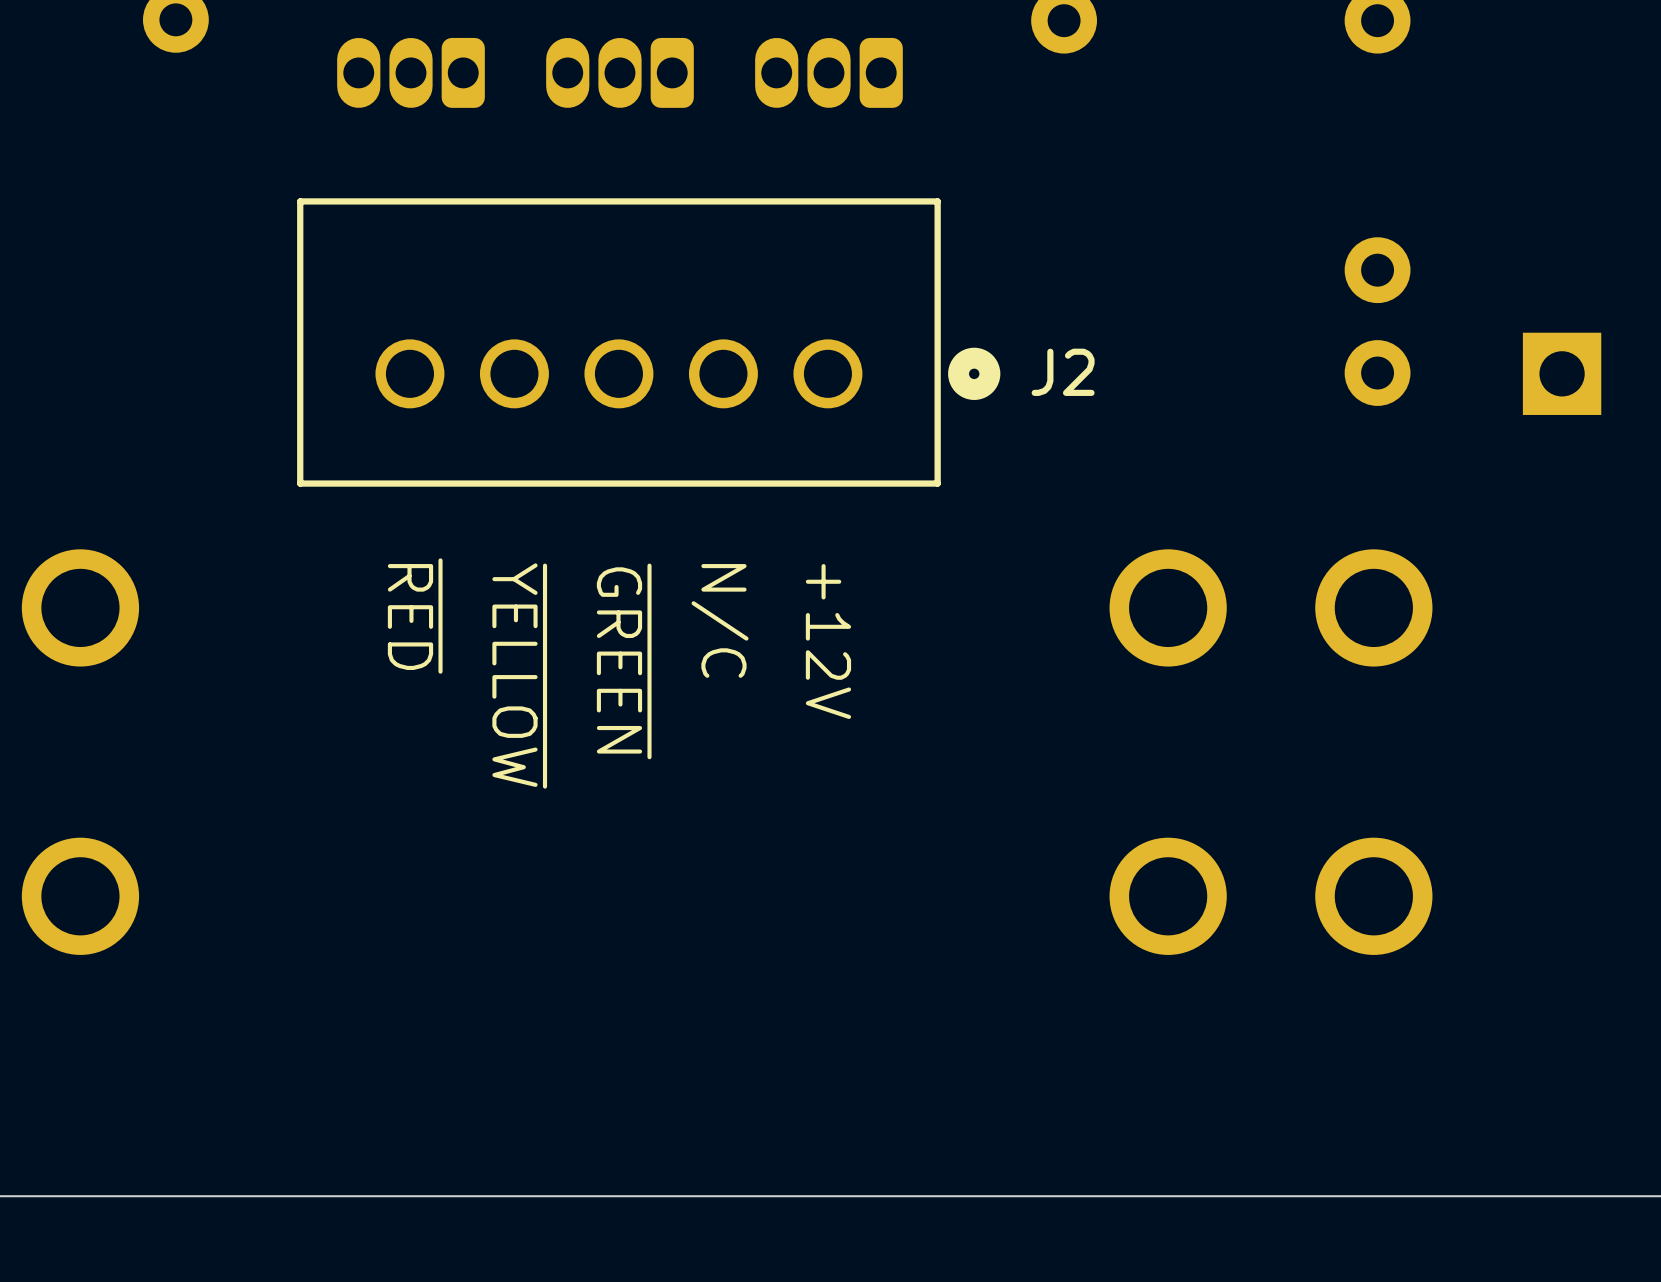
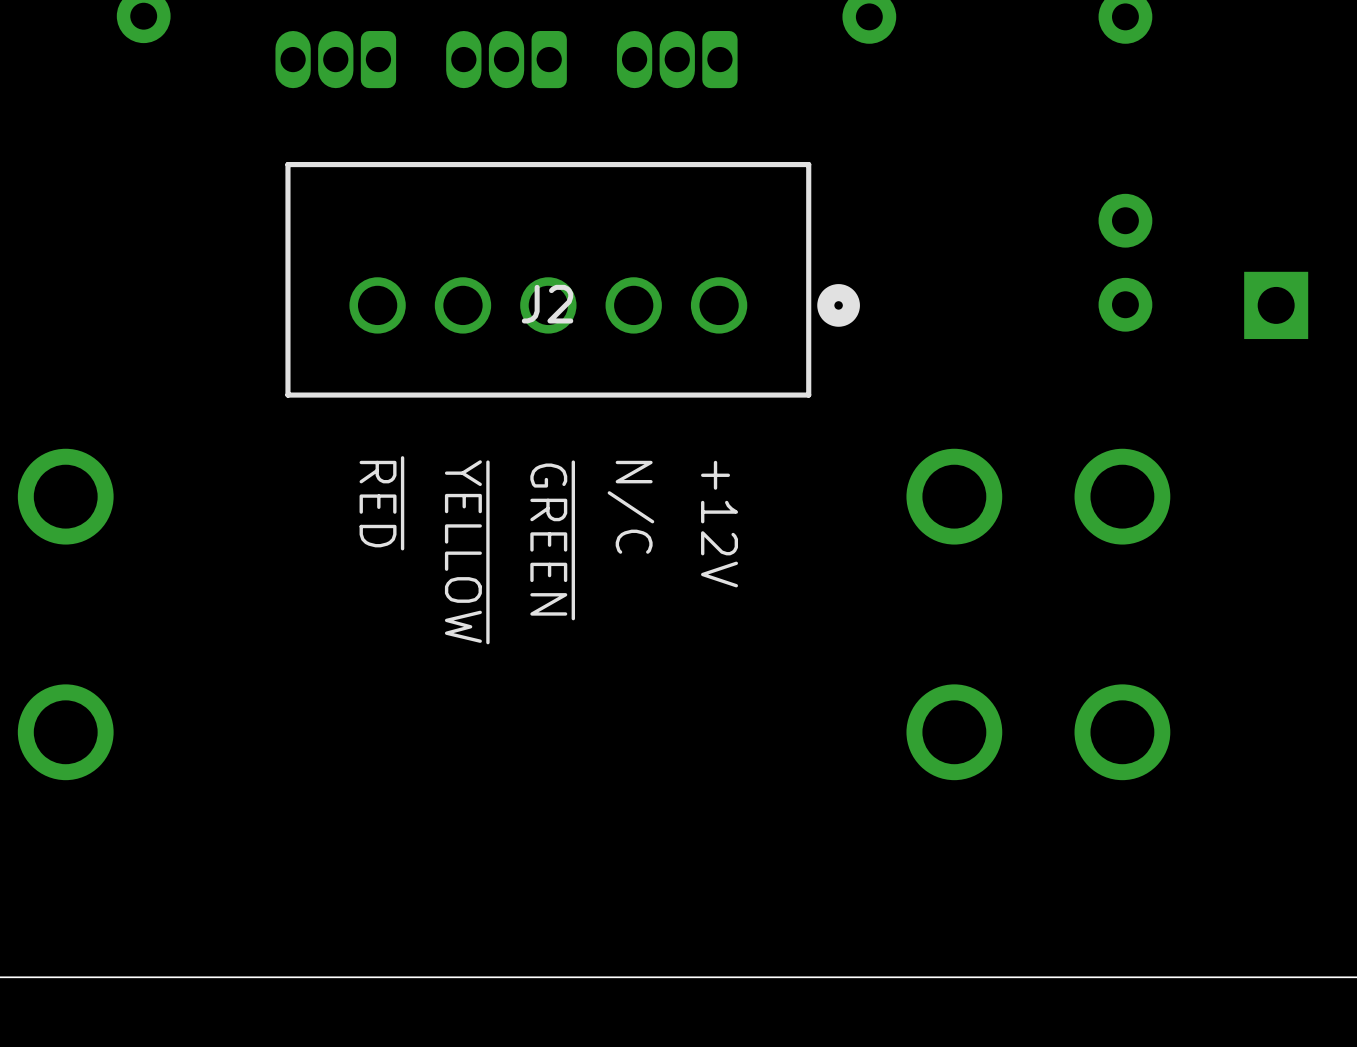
J2 position: (648, 342) -> (572, 279)
J2 name position: J2 (1063, 372) -> J2 (547, 304)
text position: ~{RED} (415, 616) -> ~{RED} (381, 503)
text position: N/C (720, 620) -> N/C (630, 507)
text position: +12V (828, 641) -> +12V (719, 524)
text position: ~{GREEN} (624, 661) -> ~{GREEN} (552, 540)
text position: ~{YELLOW} (519, 676) -> ~{YELLOW} (467, 552)

